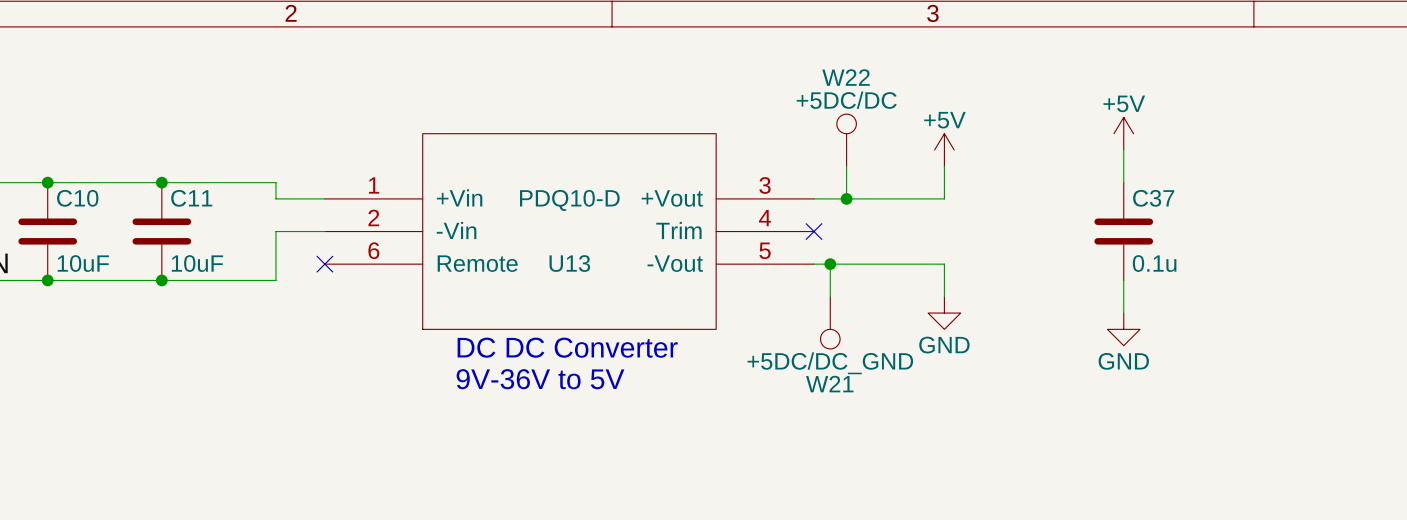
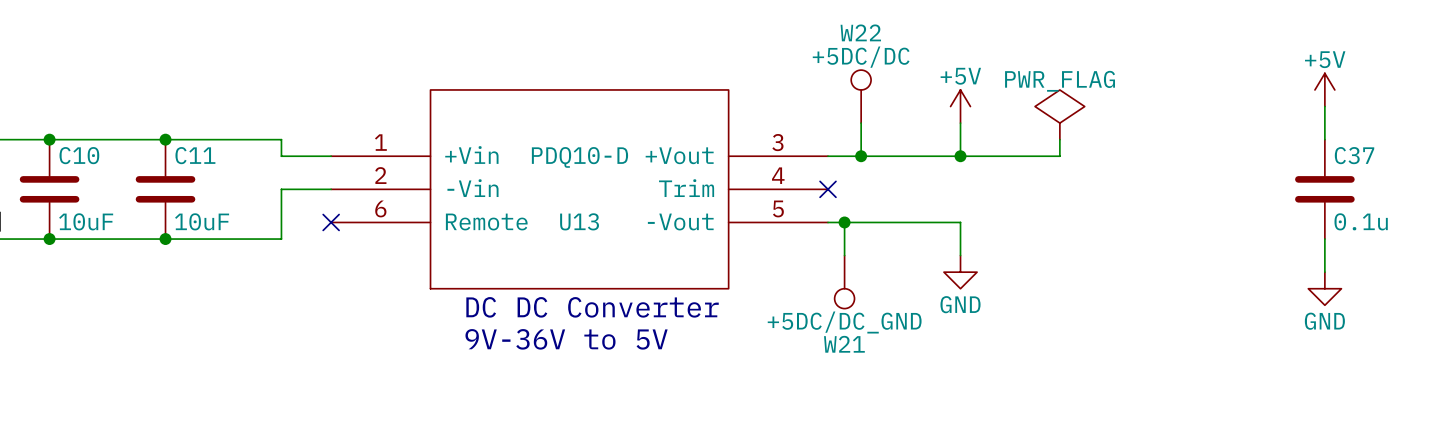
power symbol position: +5V (1123, 133) -> +5V (1324, 89)
wire: (1123, 150) (1123, 182) -> (1324, 106) (1324, 139)
power symbol: none -> PWR_FLAG (1059, 114)
wire: none -> (1059, 139) (1059, 156) (960, 156)
junction: none -> (960, 156)
C37 position: (1123, 231) -> (1324, 189)
wire: (1123, 280) (1123, 313) -> (1324, 239) (1324, 272)
power symbol position: GND (1123, 329) -> GND (1324, 288)

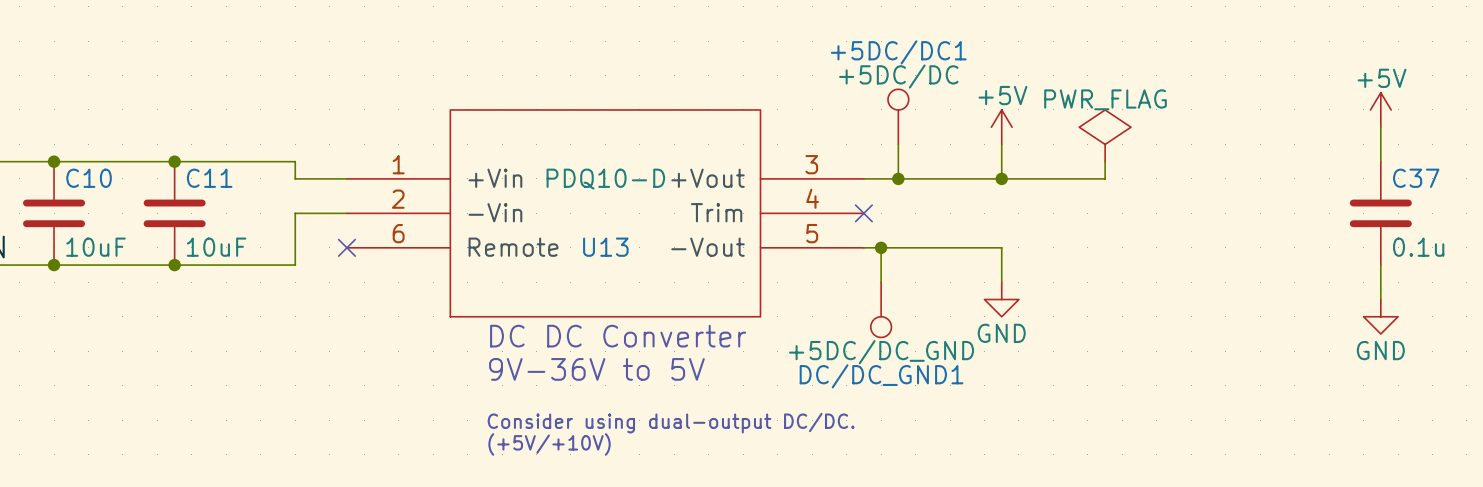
W22 name: W22 (860, 32) -> +5DC/DC1 (898, 52)
W21 name: W21 (844, 344) -> DC/DC_GND1 (881, 376)
text: none -> Consider using dual-output DC/DC. (671, 423)
text: none -> (+5V/+10V) (549, 444)

